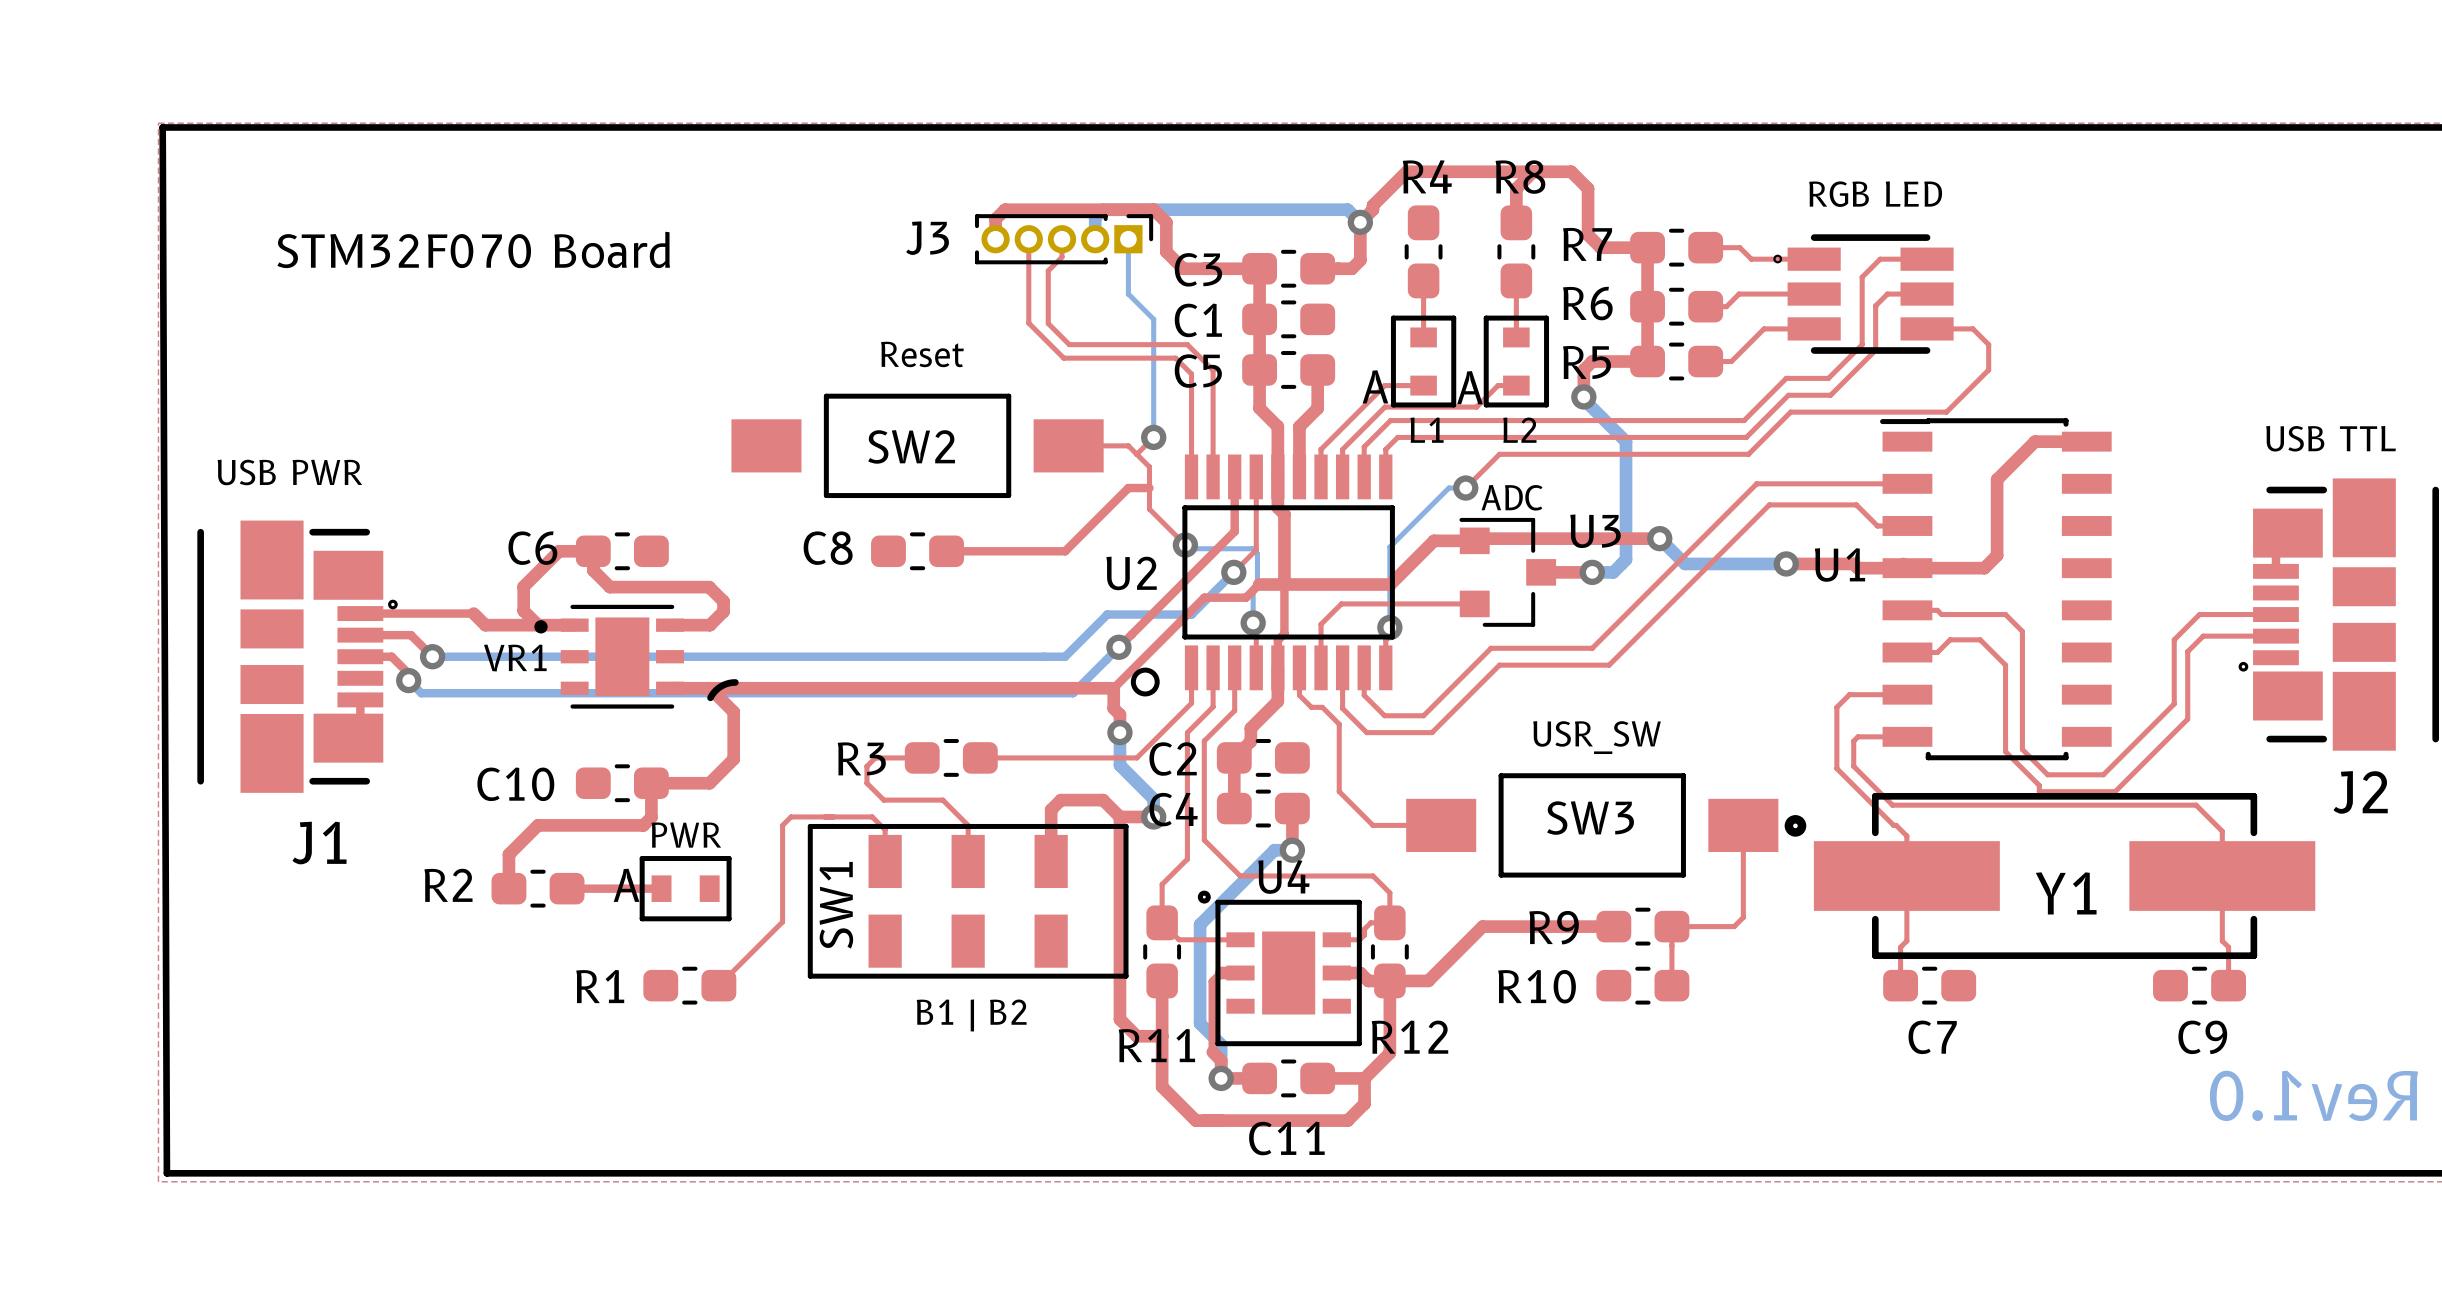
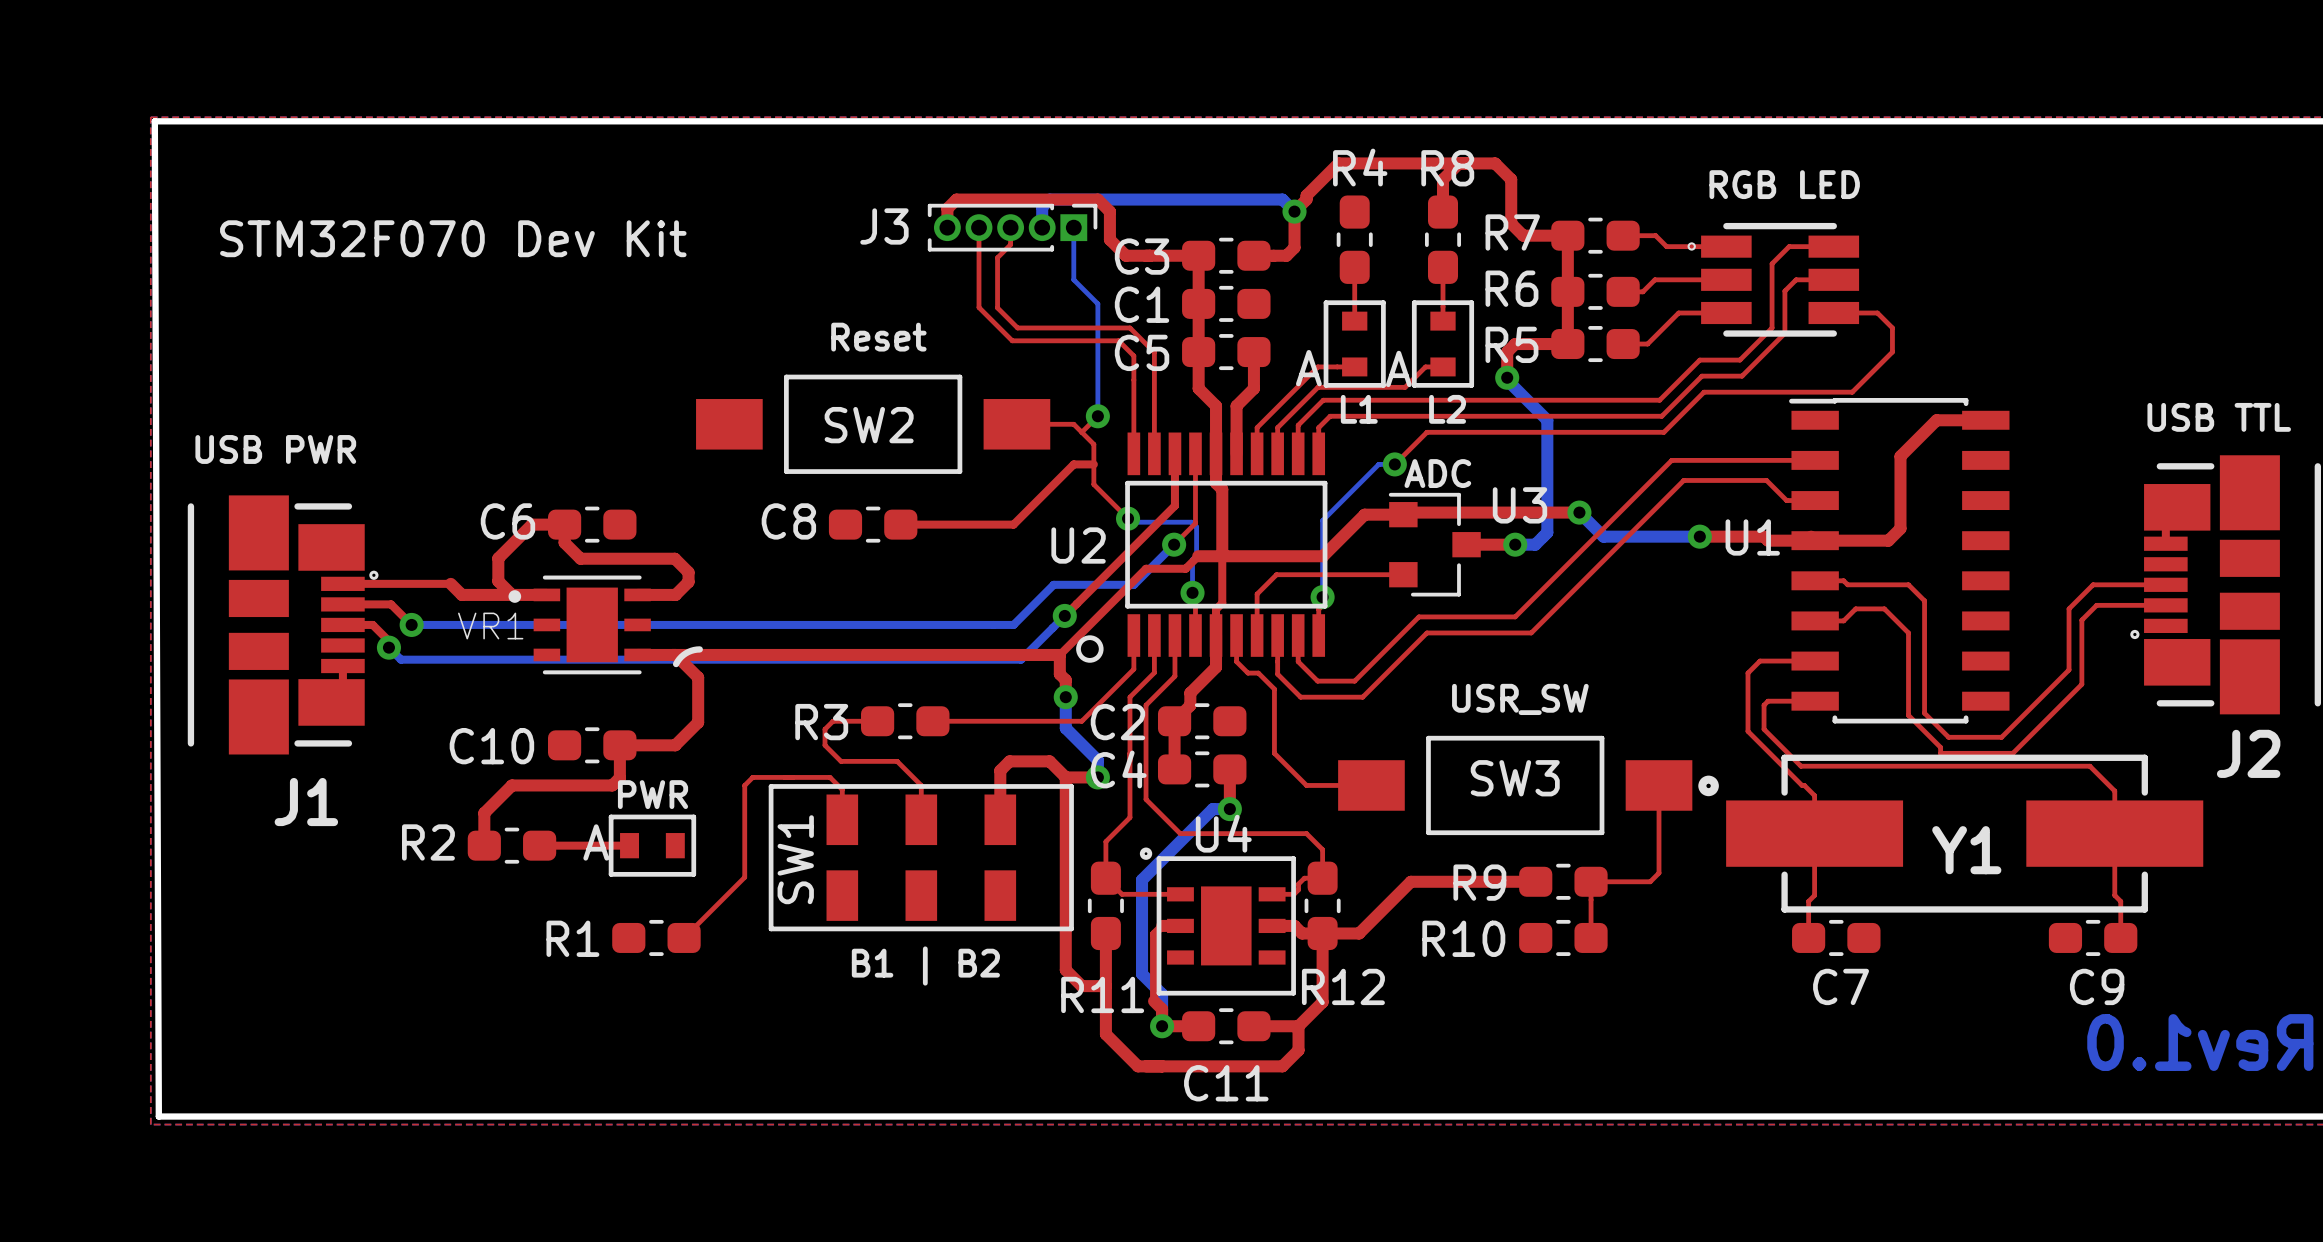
text: STM32F070 Board (473, 249) -> STM32F070 Dev Kit (453, 238)

